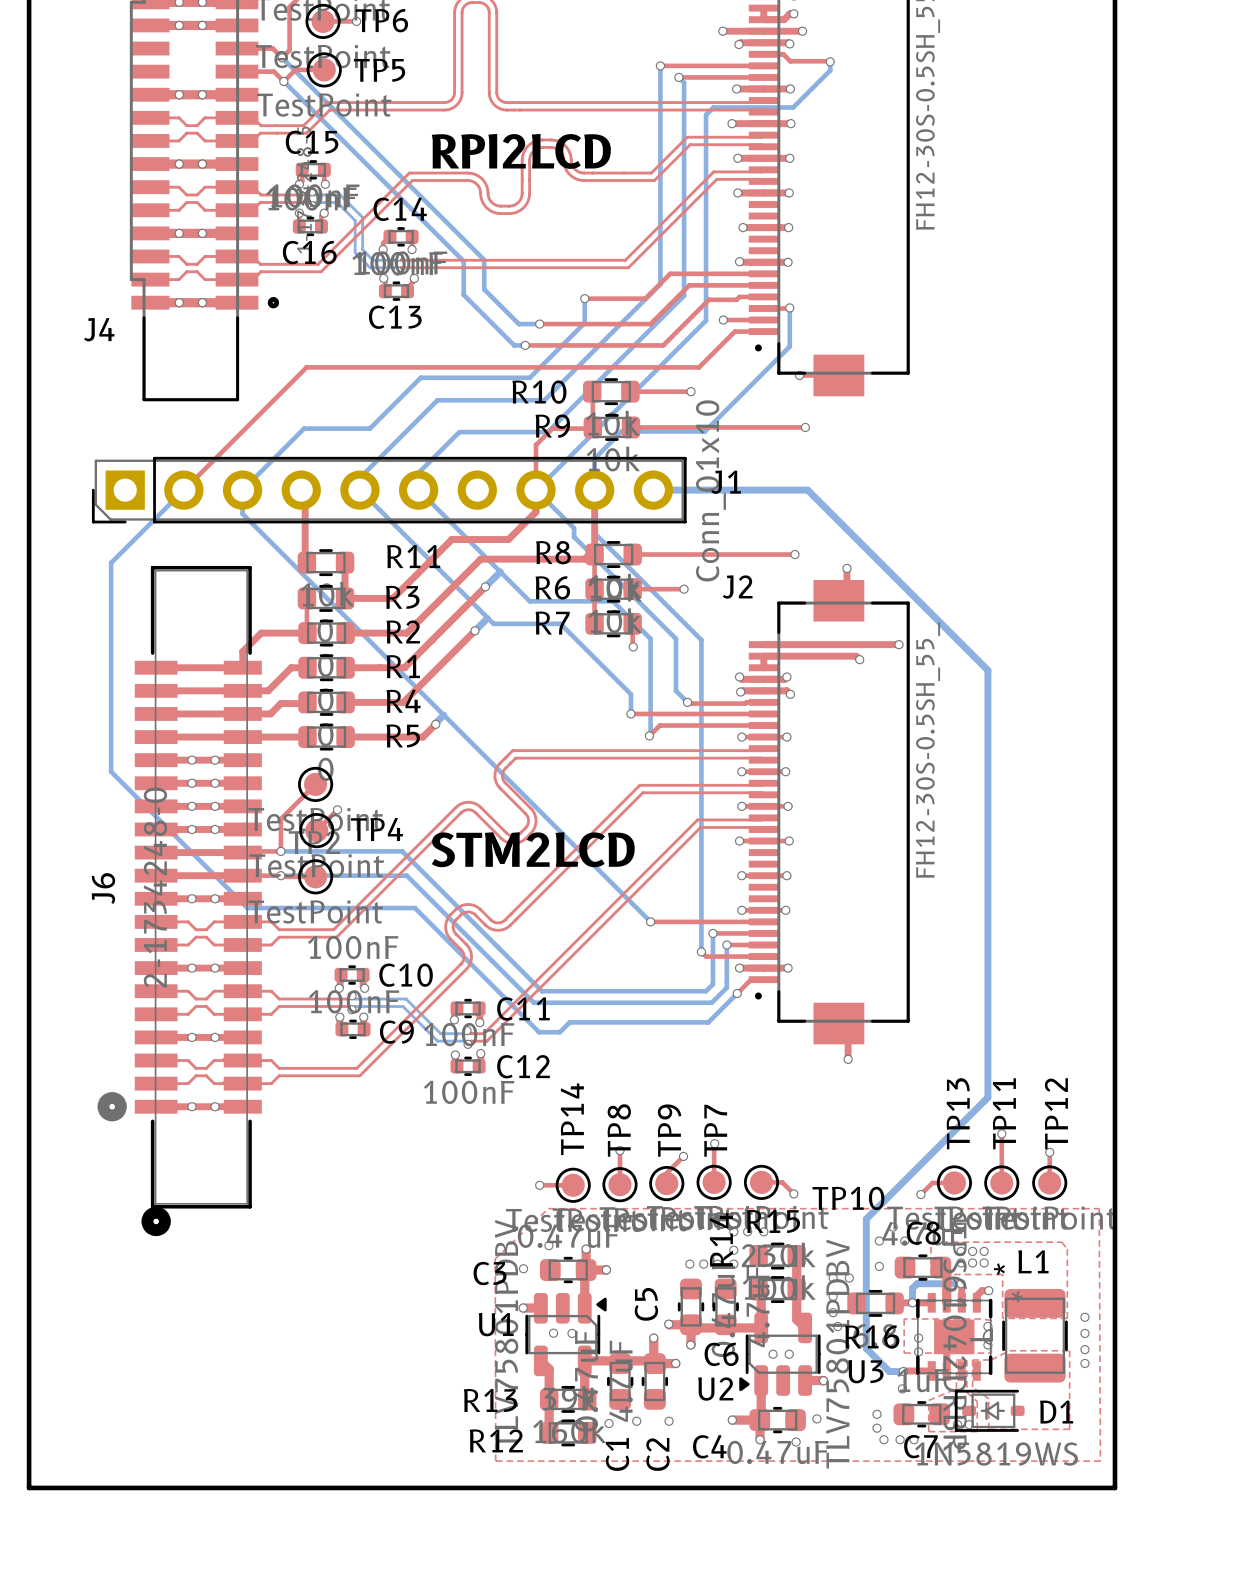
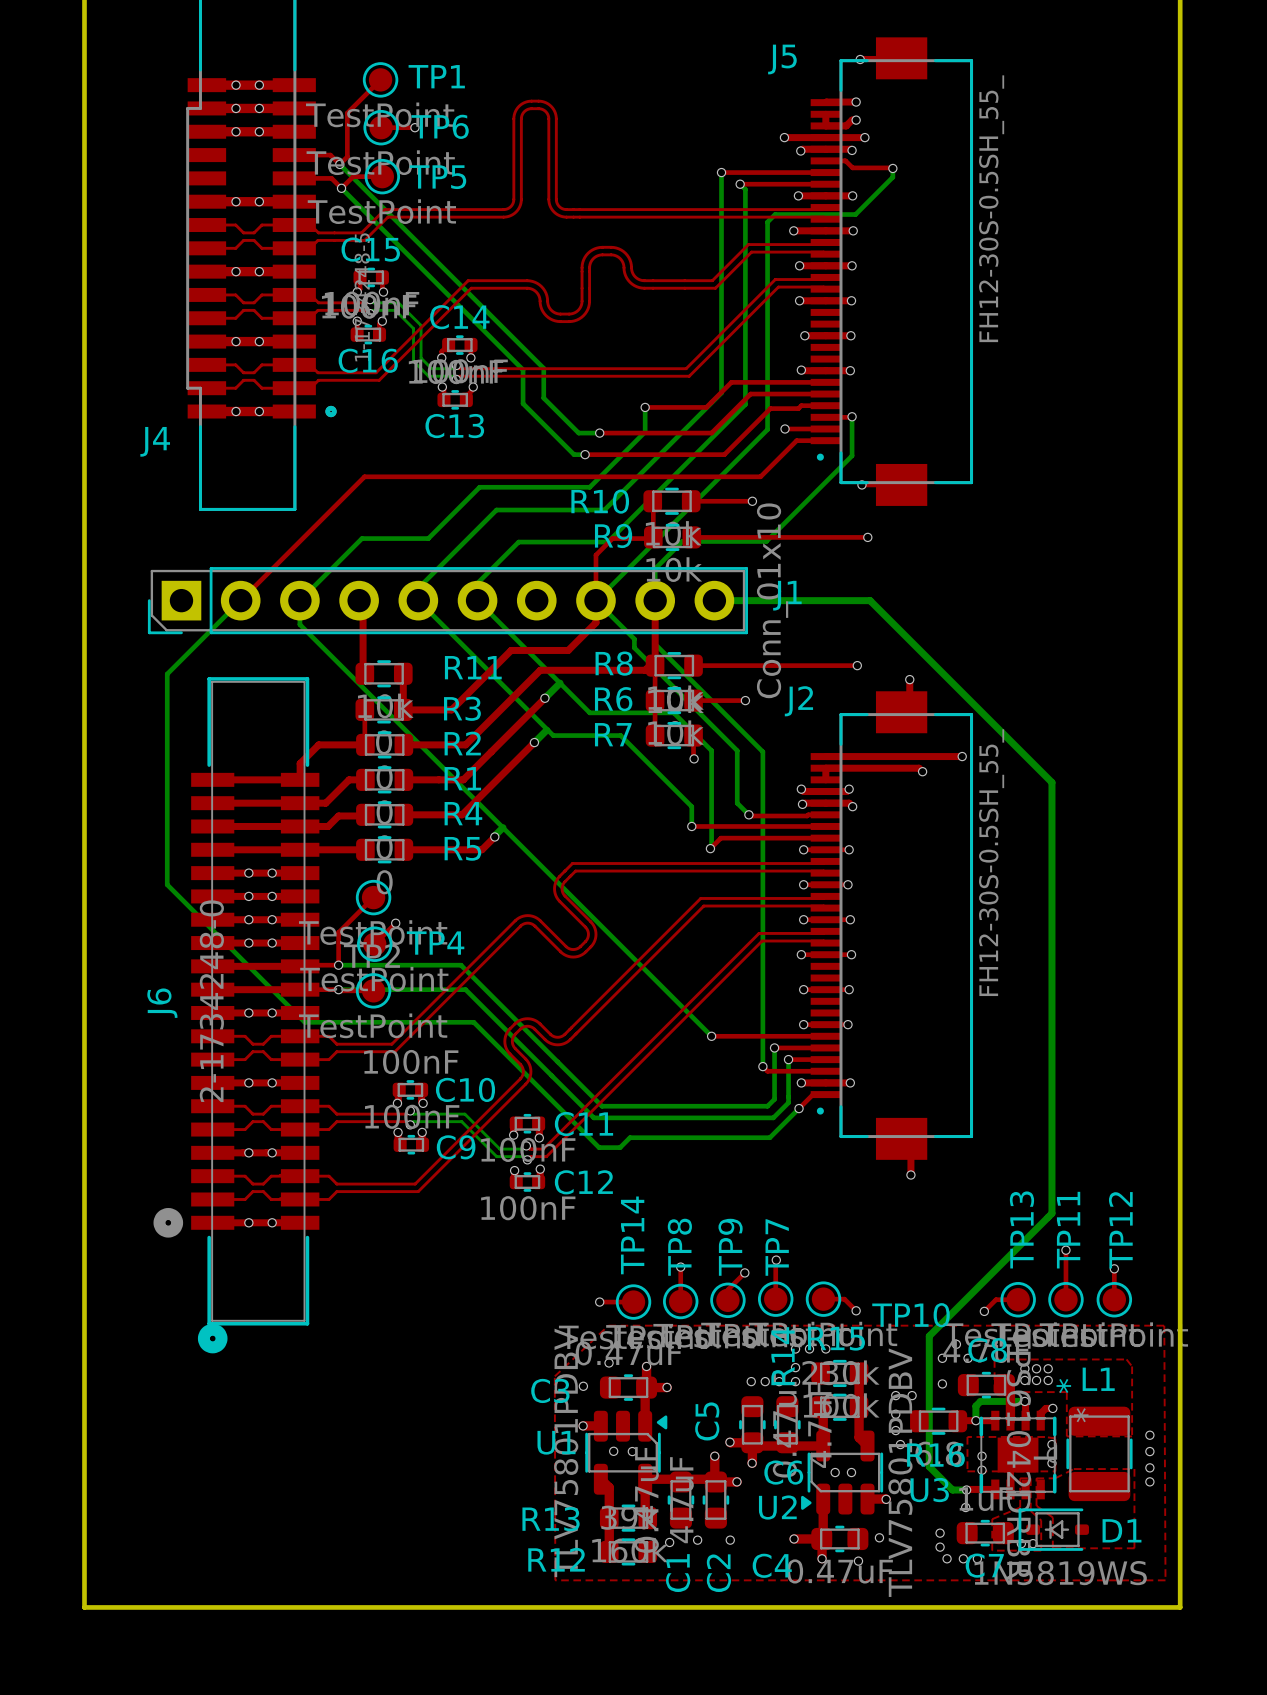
text: RPI2LCD (521, 151) -> none
text: STM2LCD (533, 849) -> none

